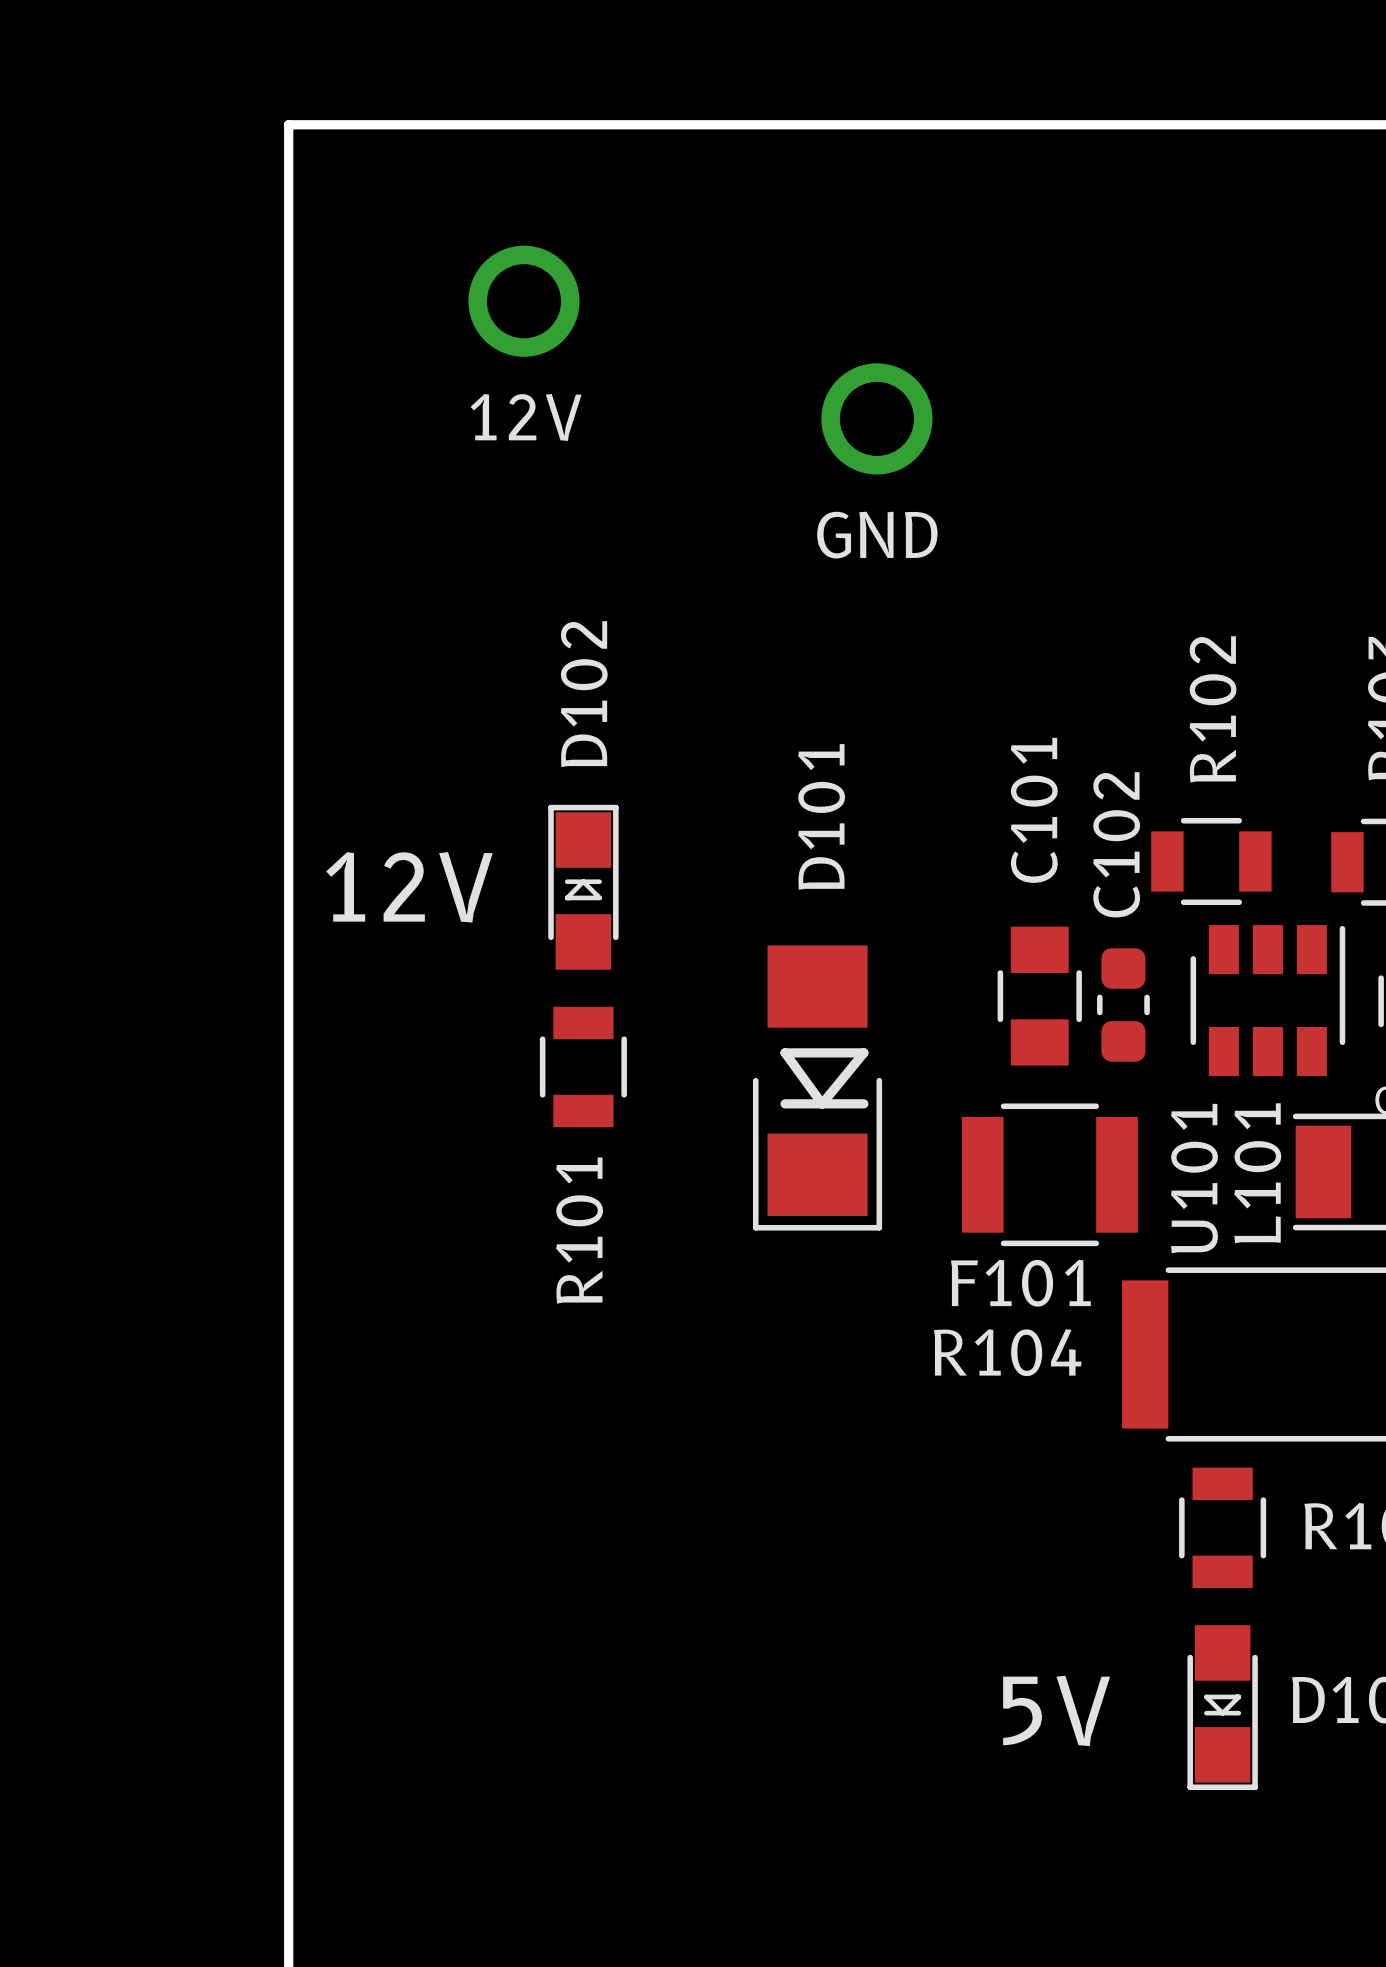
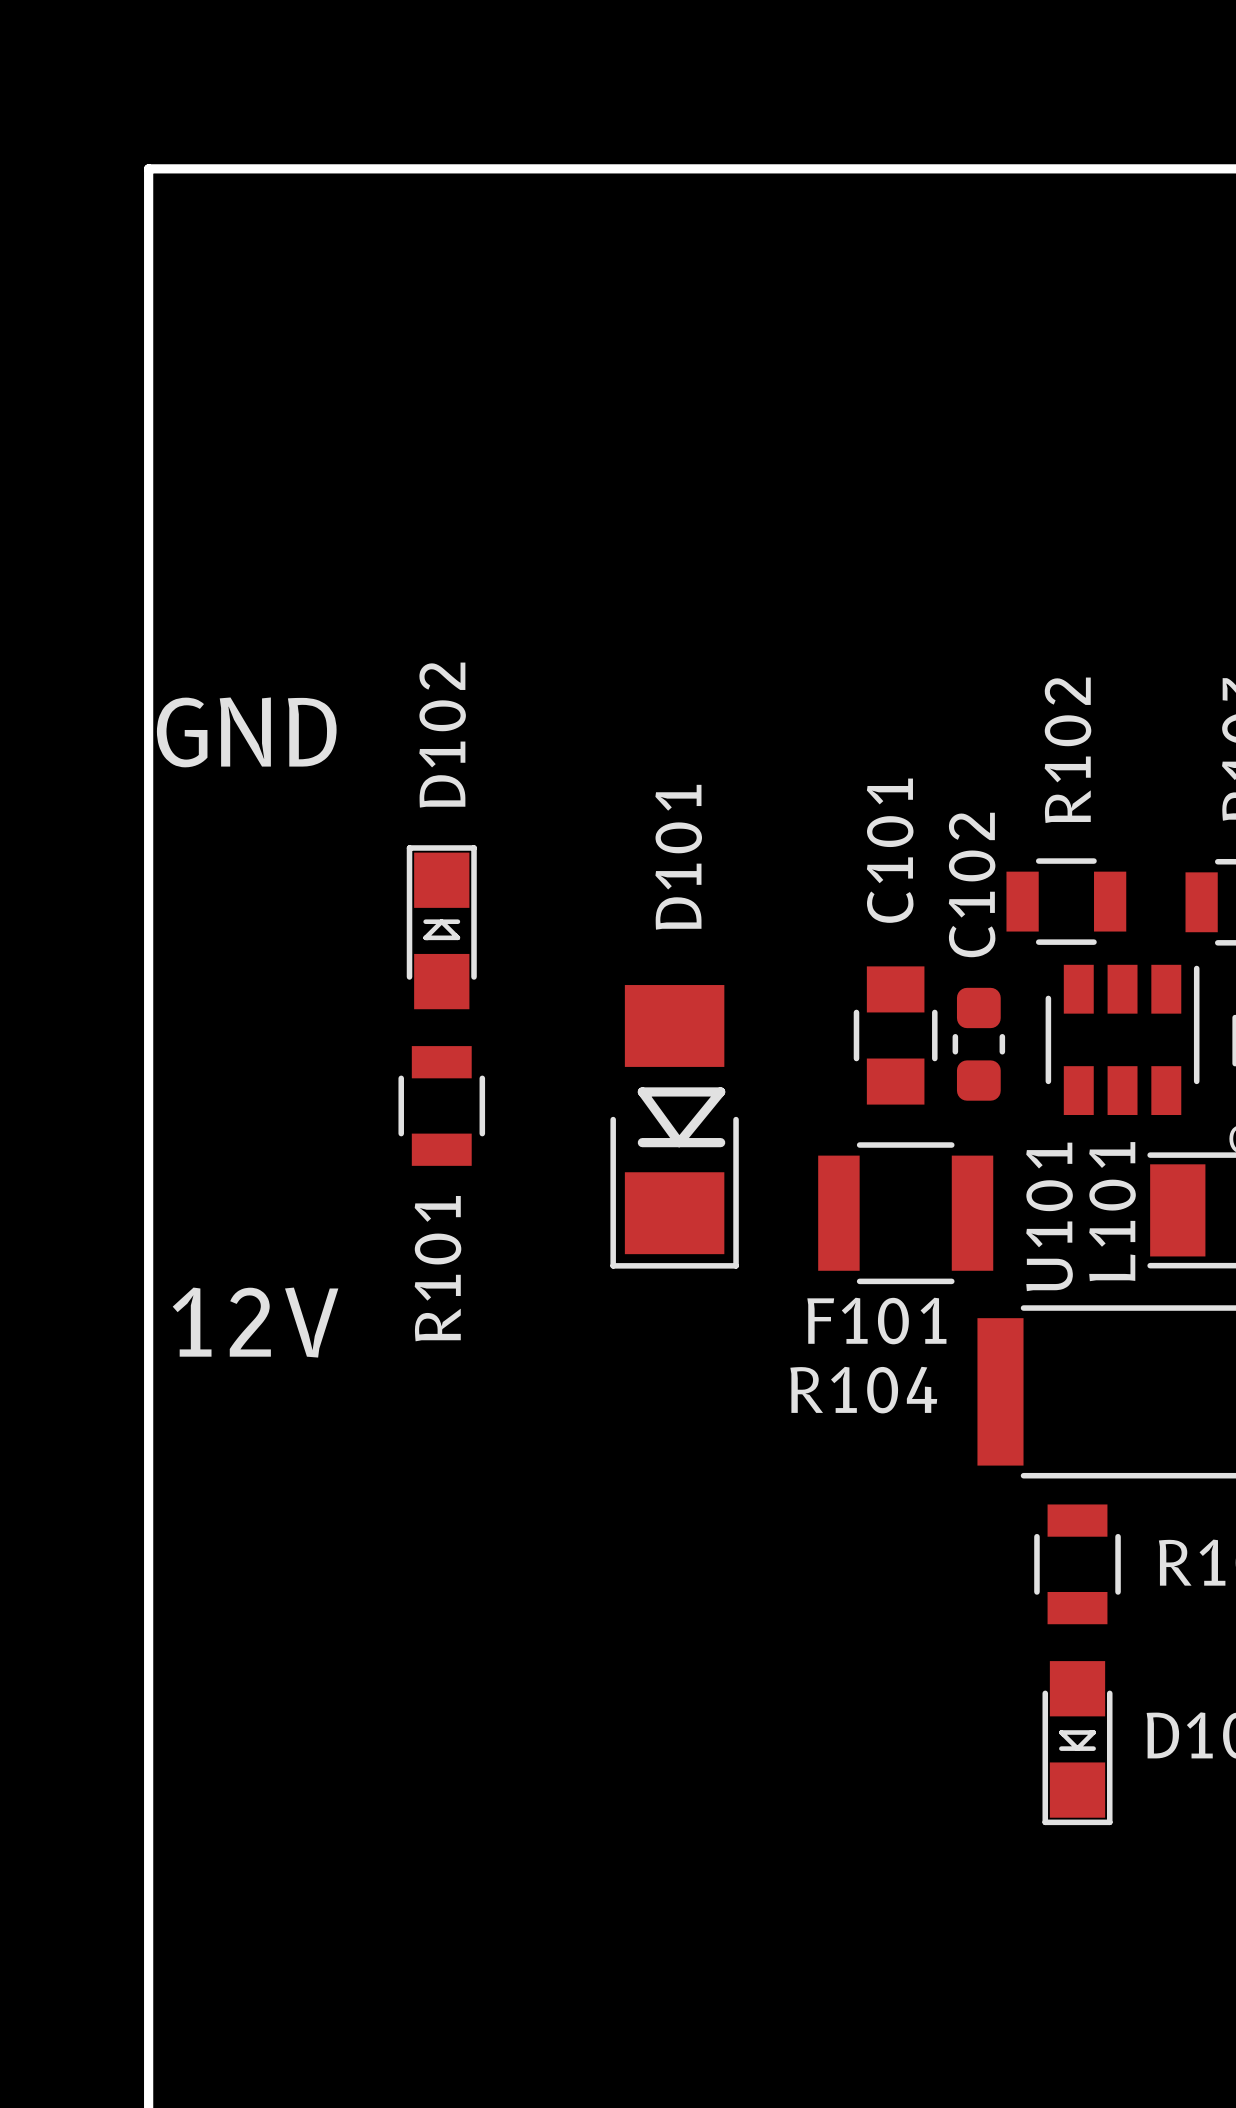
12V: (523, 301) -> none
GND: (876, 418) -> none
text: none -> GND (246, 732)
text position: 12V (409, 887) -> 12V (255, 1322)
text: 5V (1056, 1710) -> none

